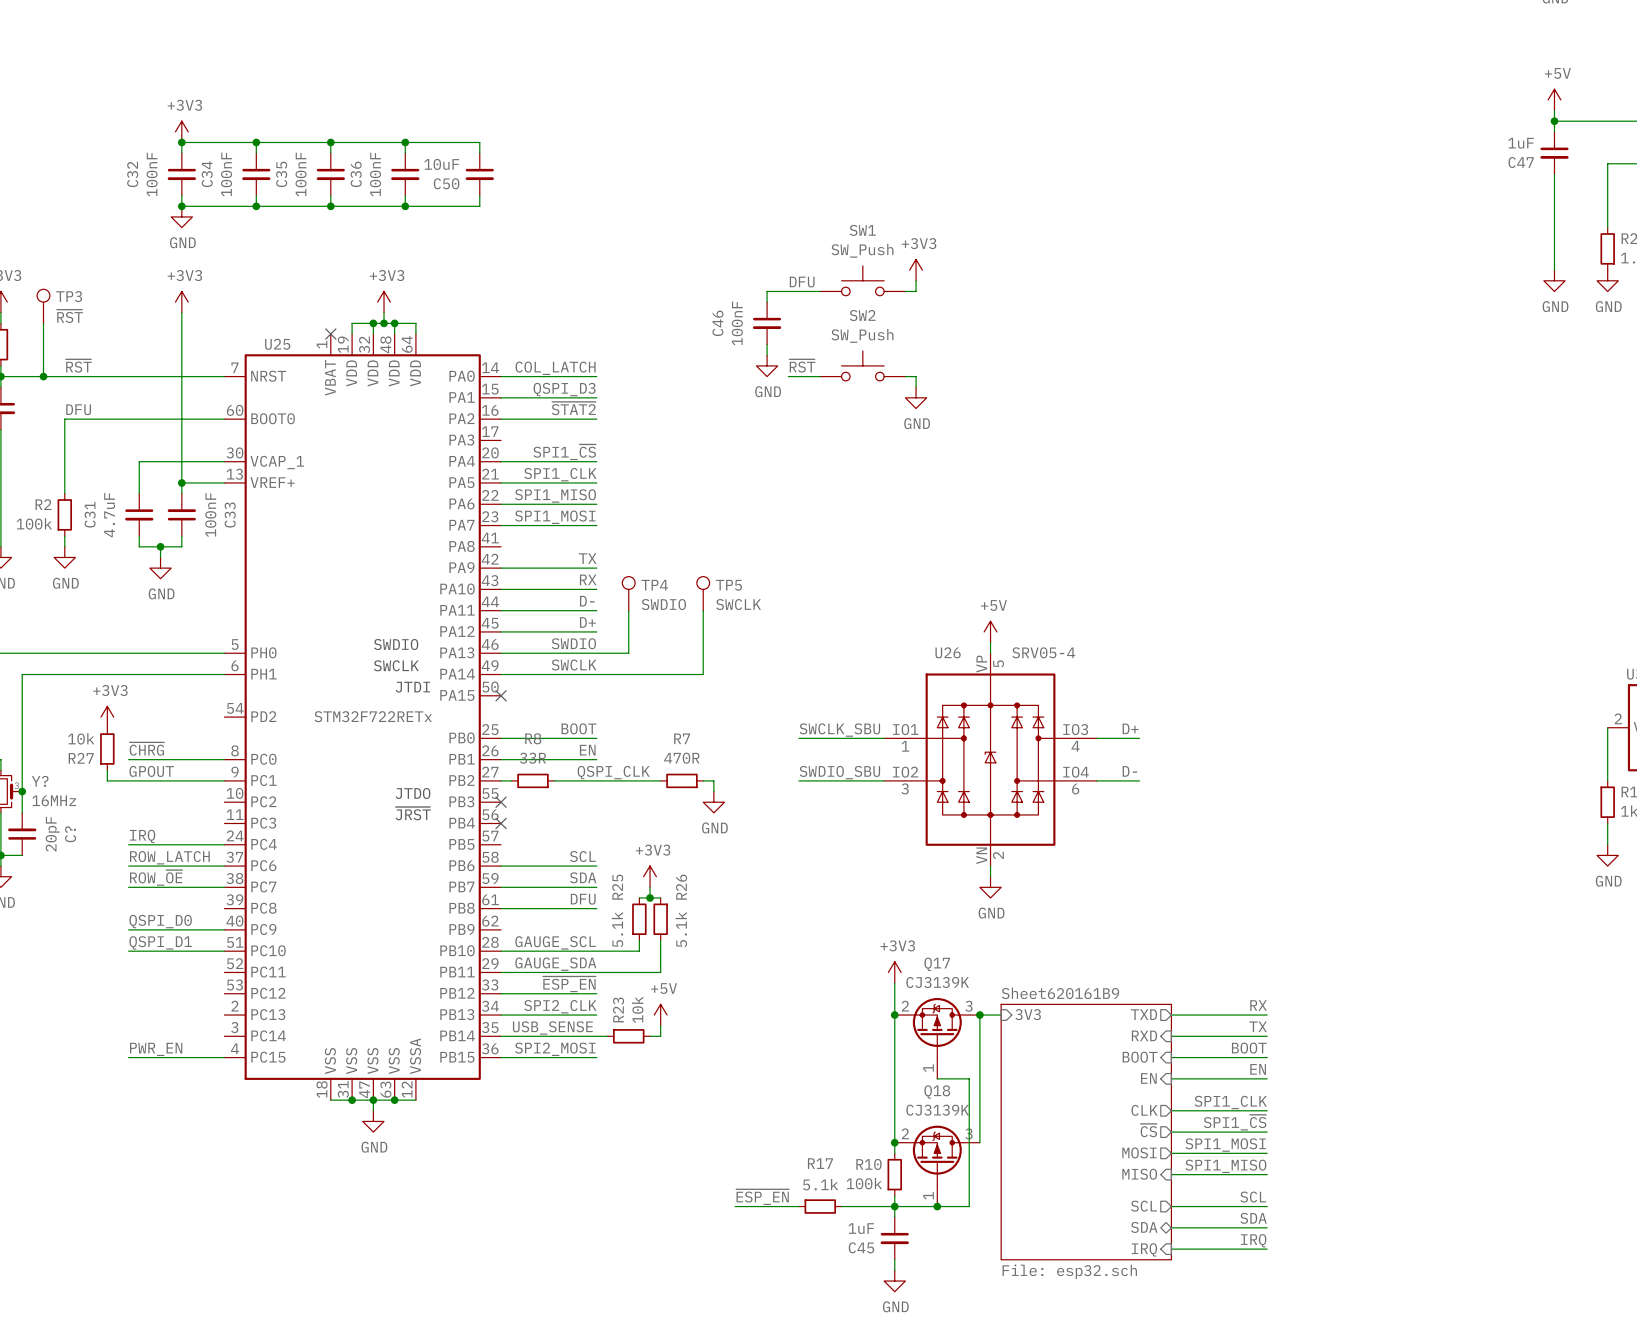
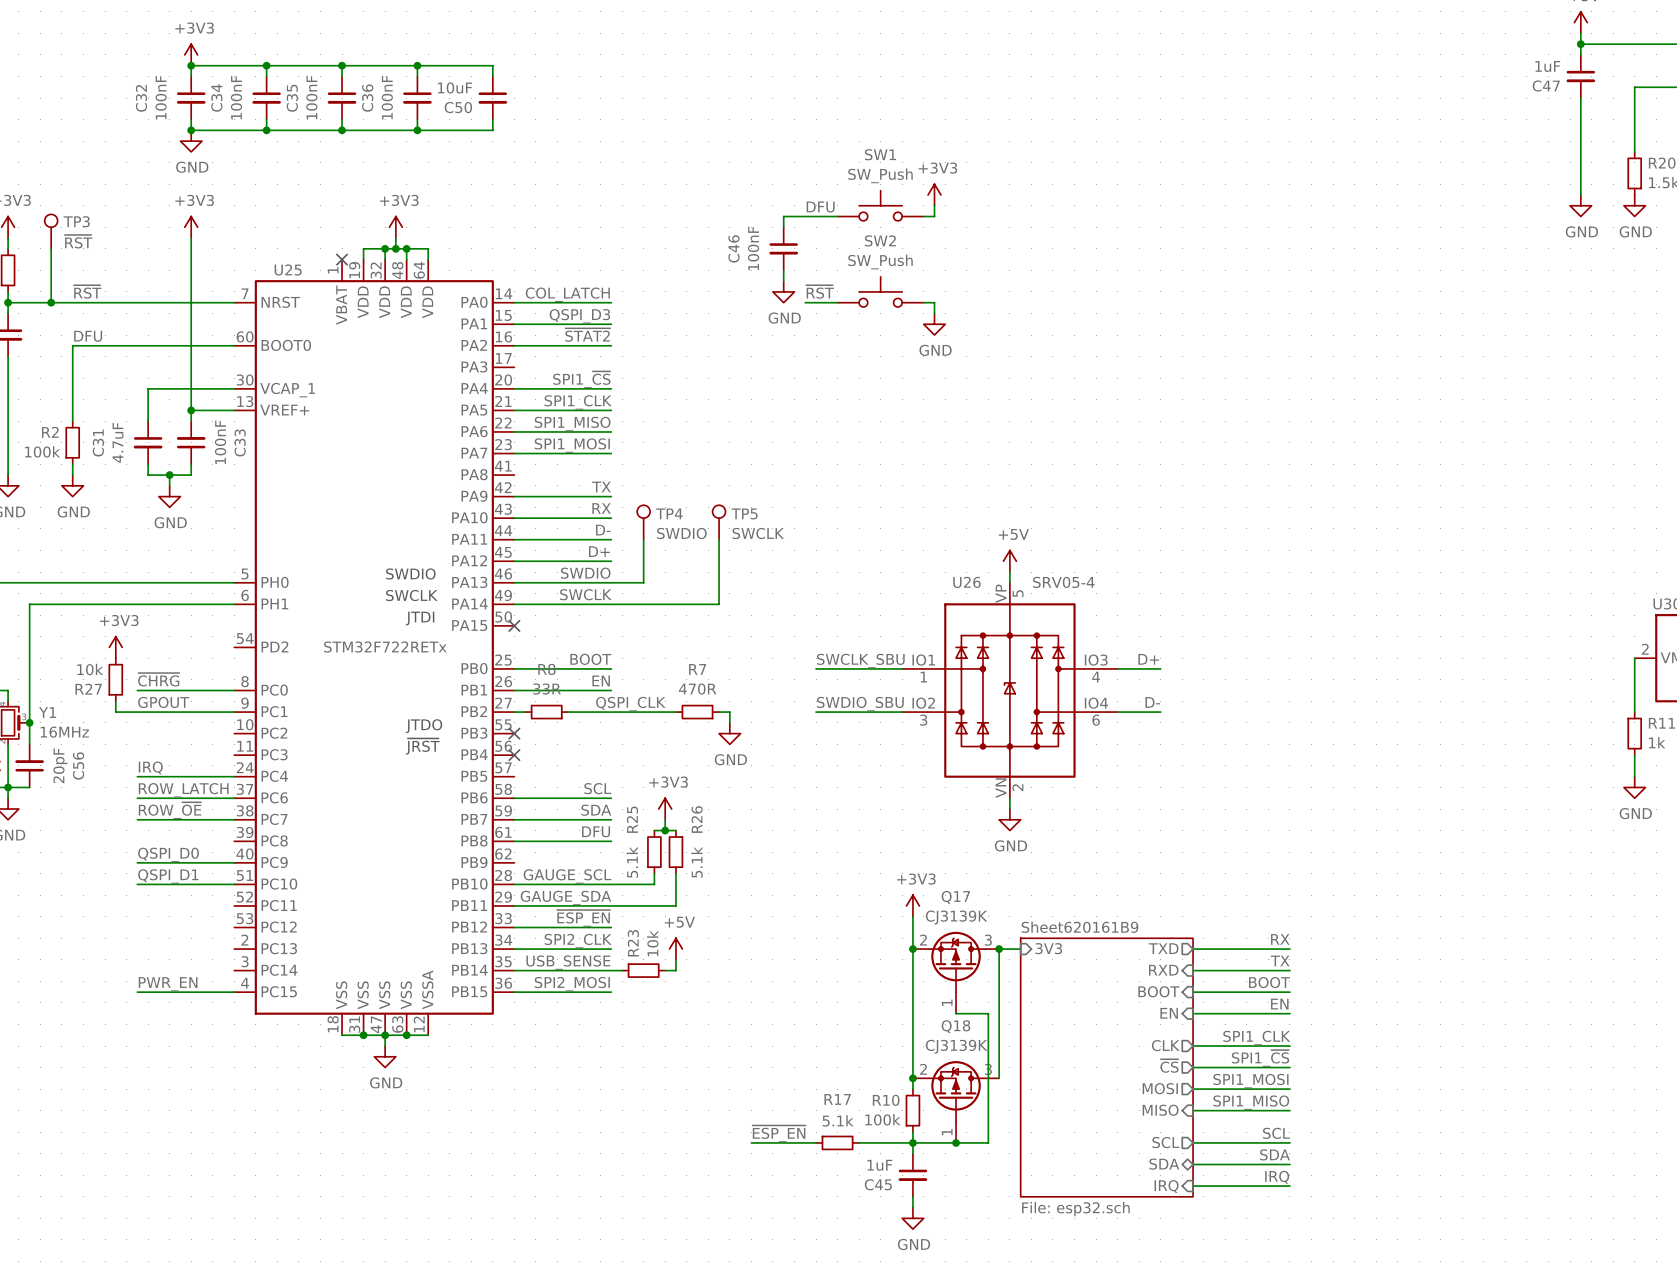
Y? name: Y? (40, 781) -> Y1 (47, 712)
C? name: C? (70, 834) -> C56 (78, 765)

